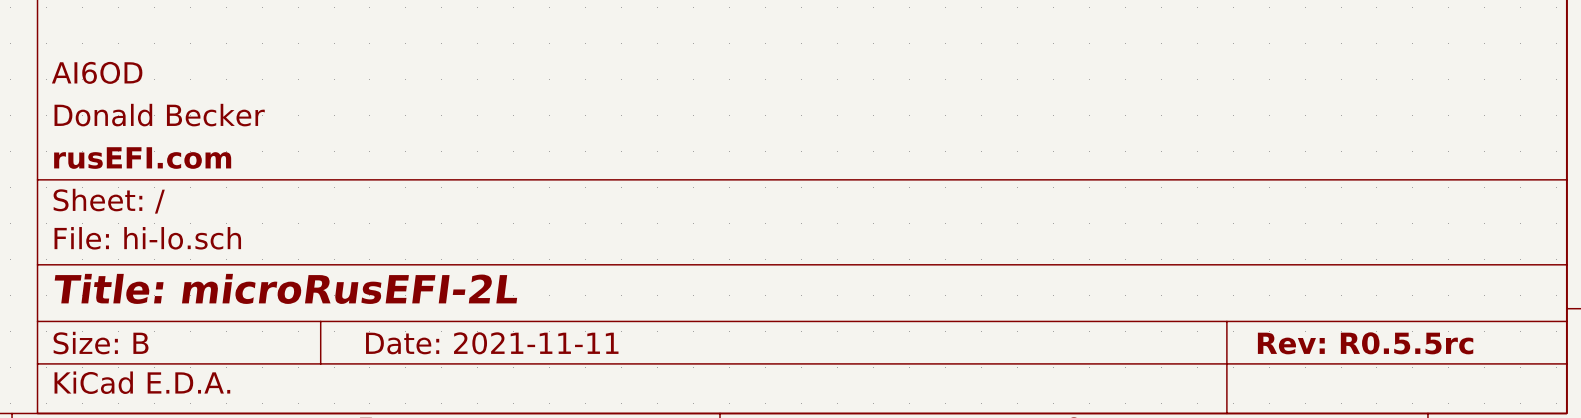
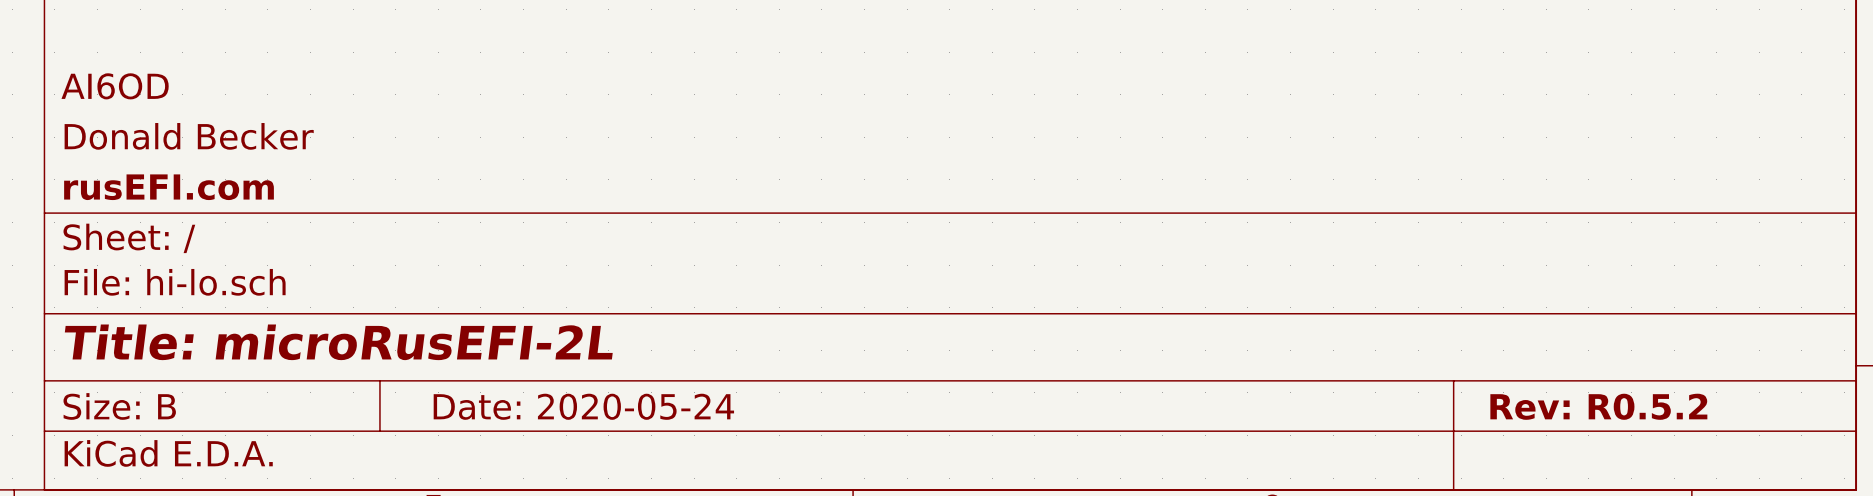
title block: Date: 2021-11-11 (492, 343) -> Date: 2020-05-24 (583, 406)
title block: Rev: R0.5.5rc (1365, 343) -> Rev: R0.5.2 (1598, 406)

